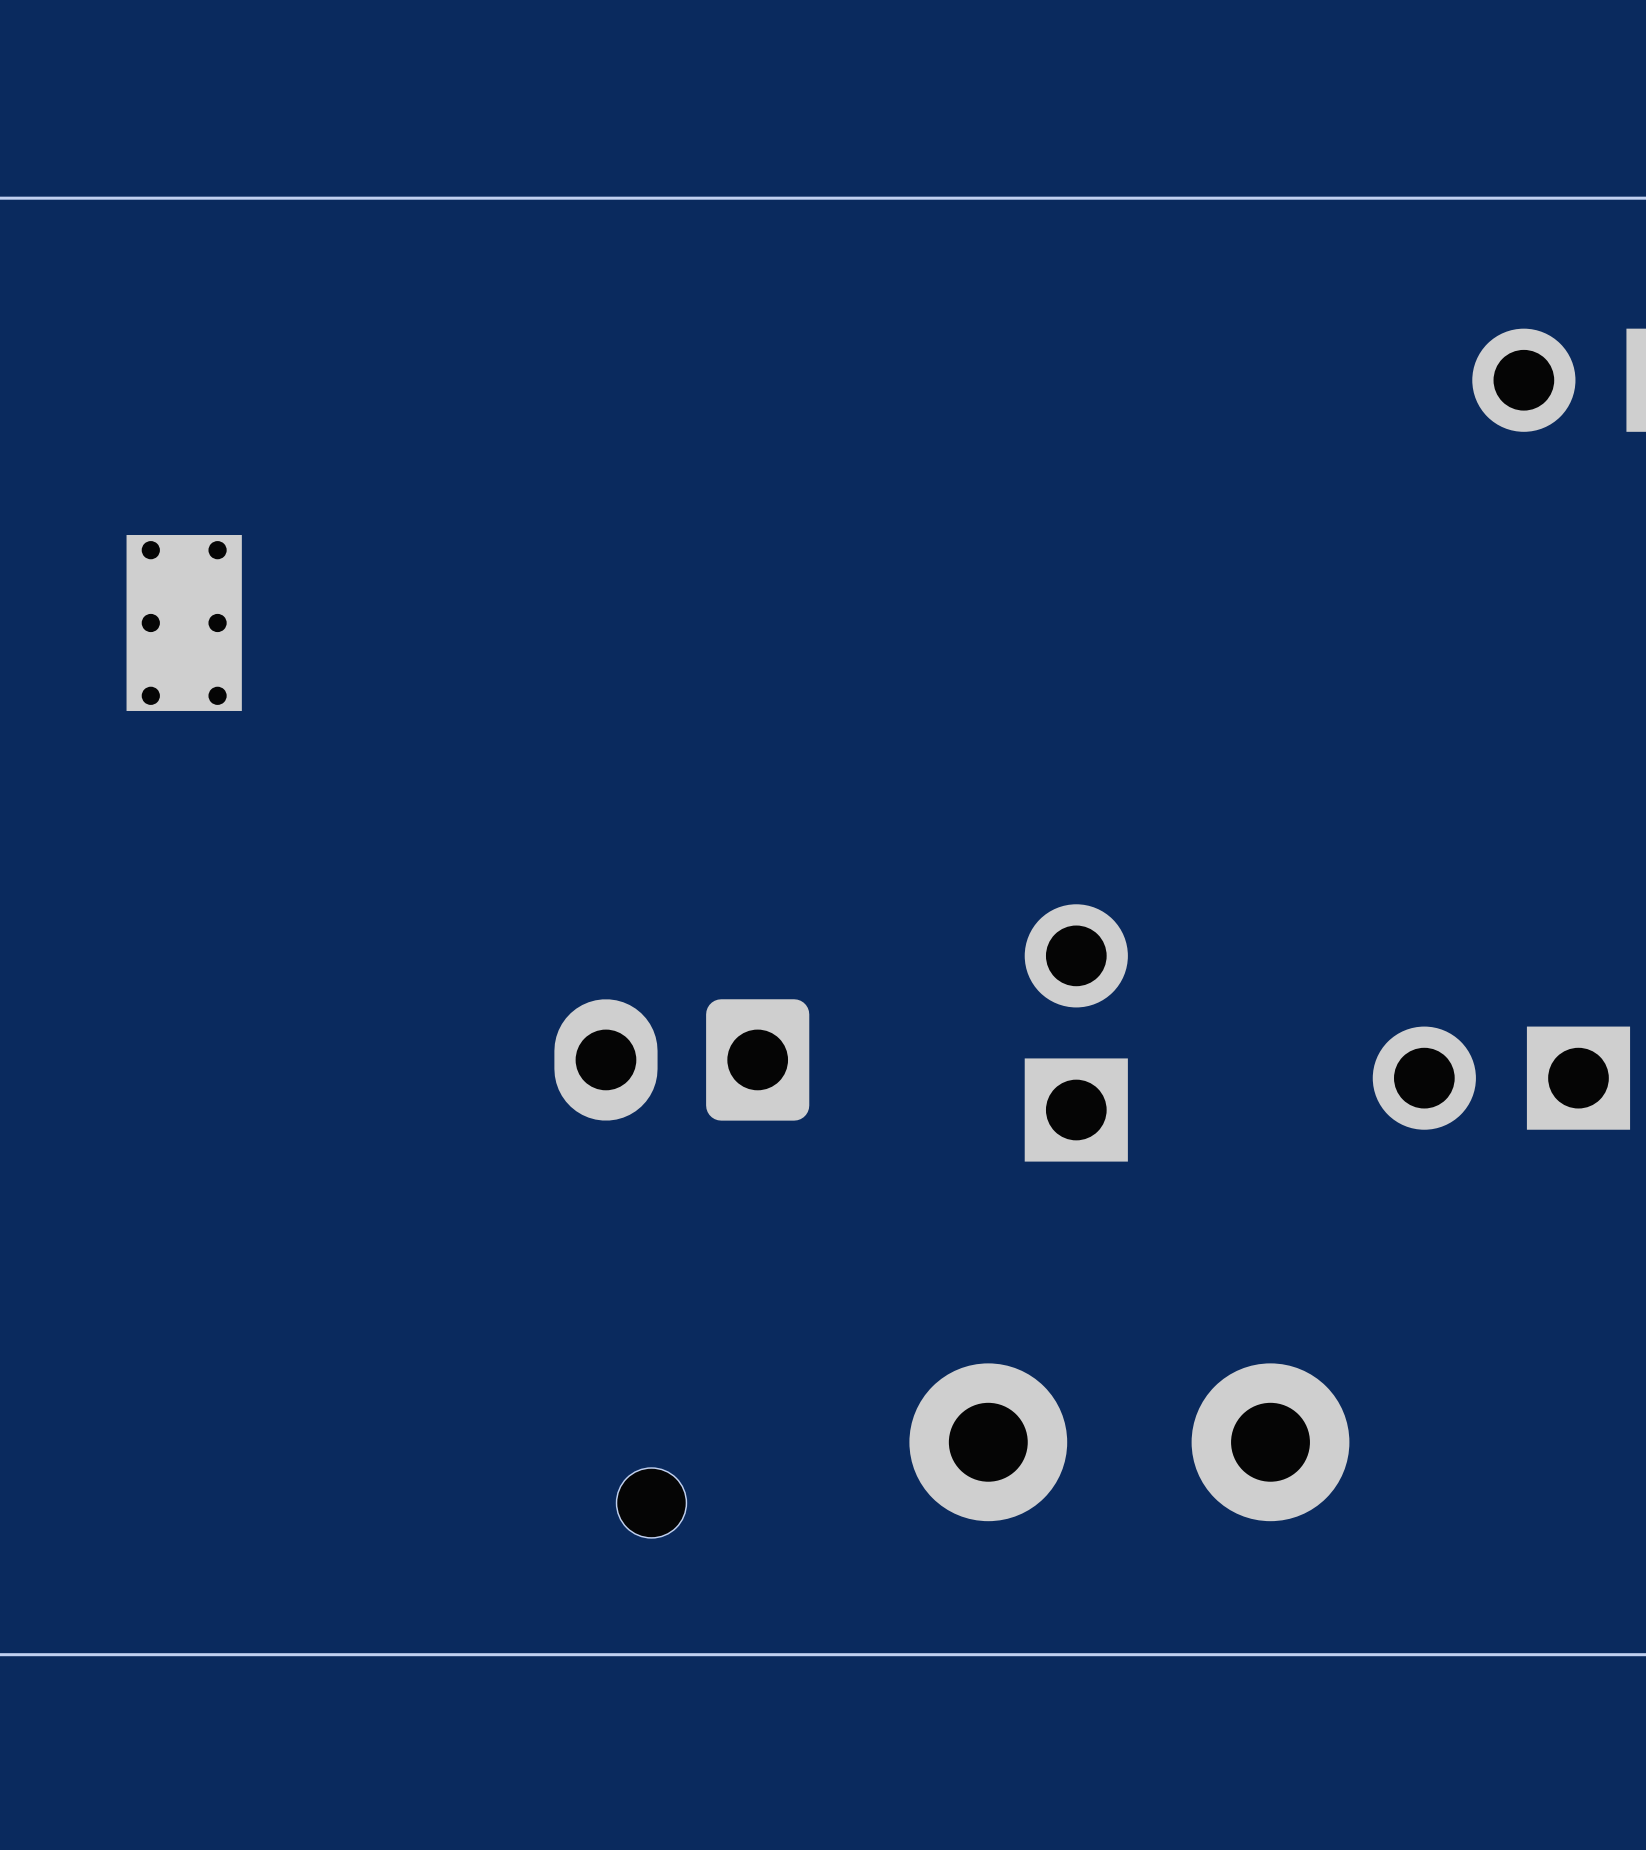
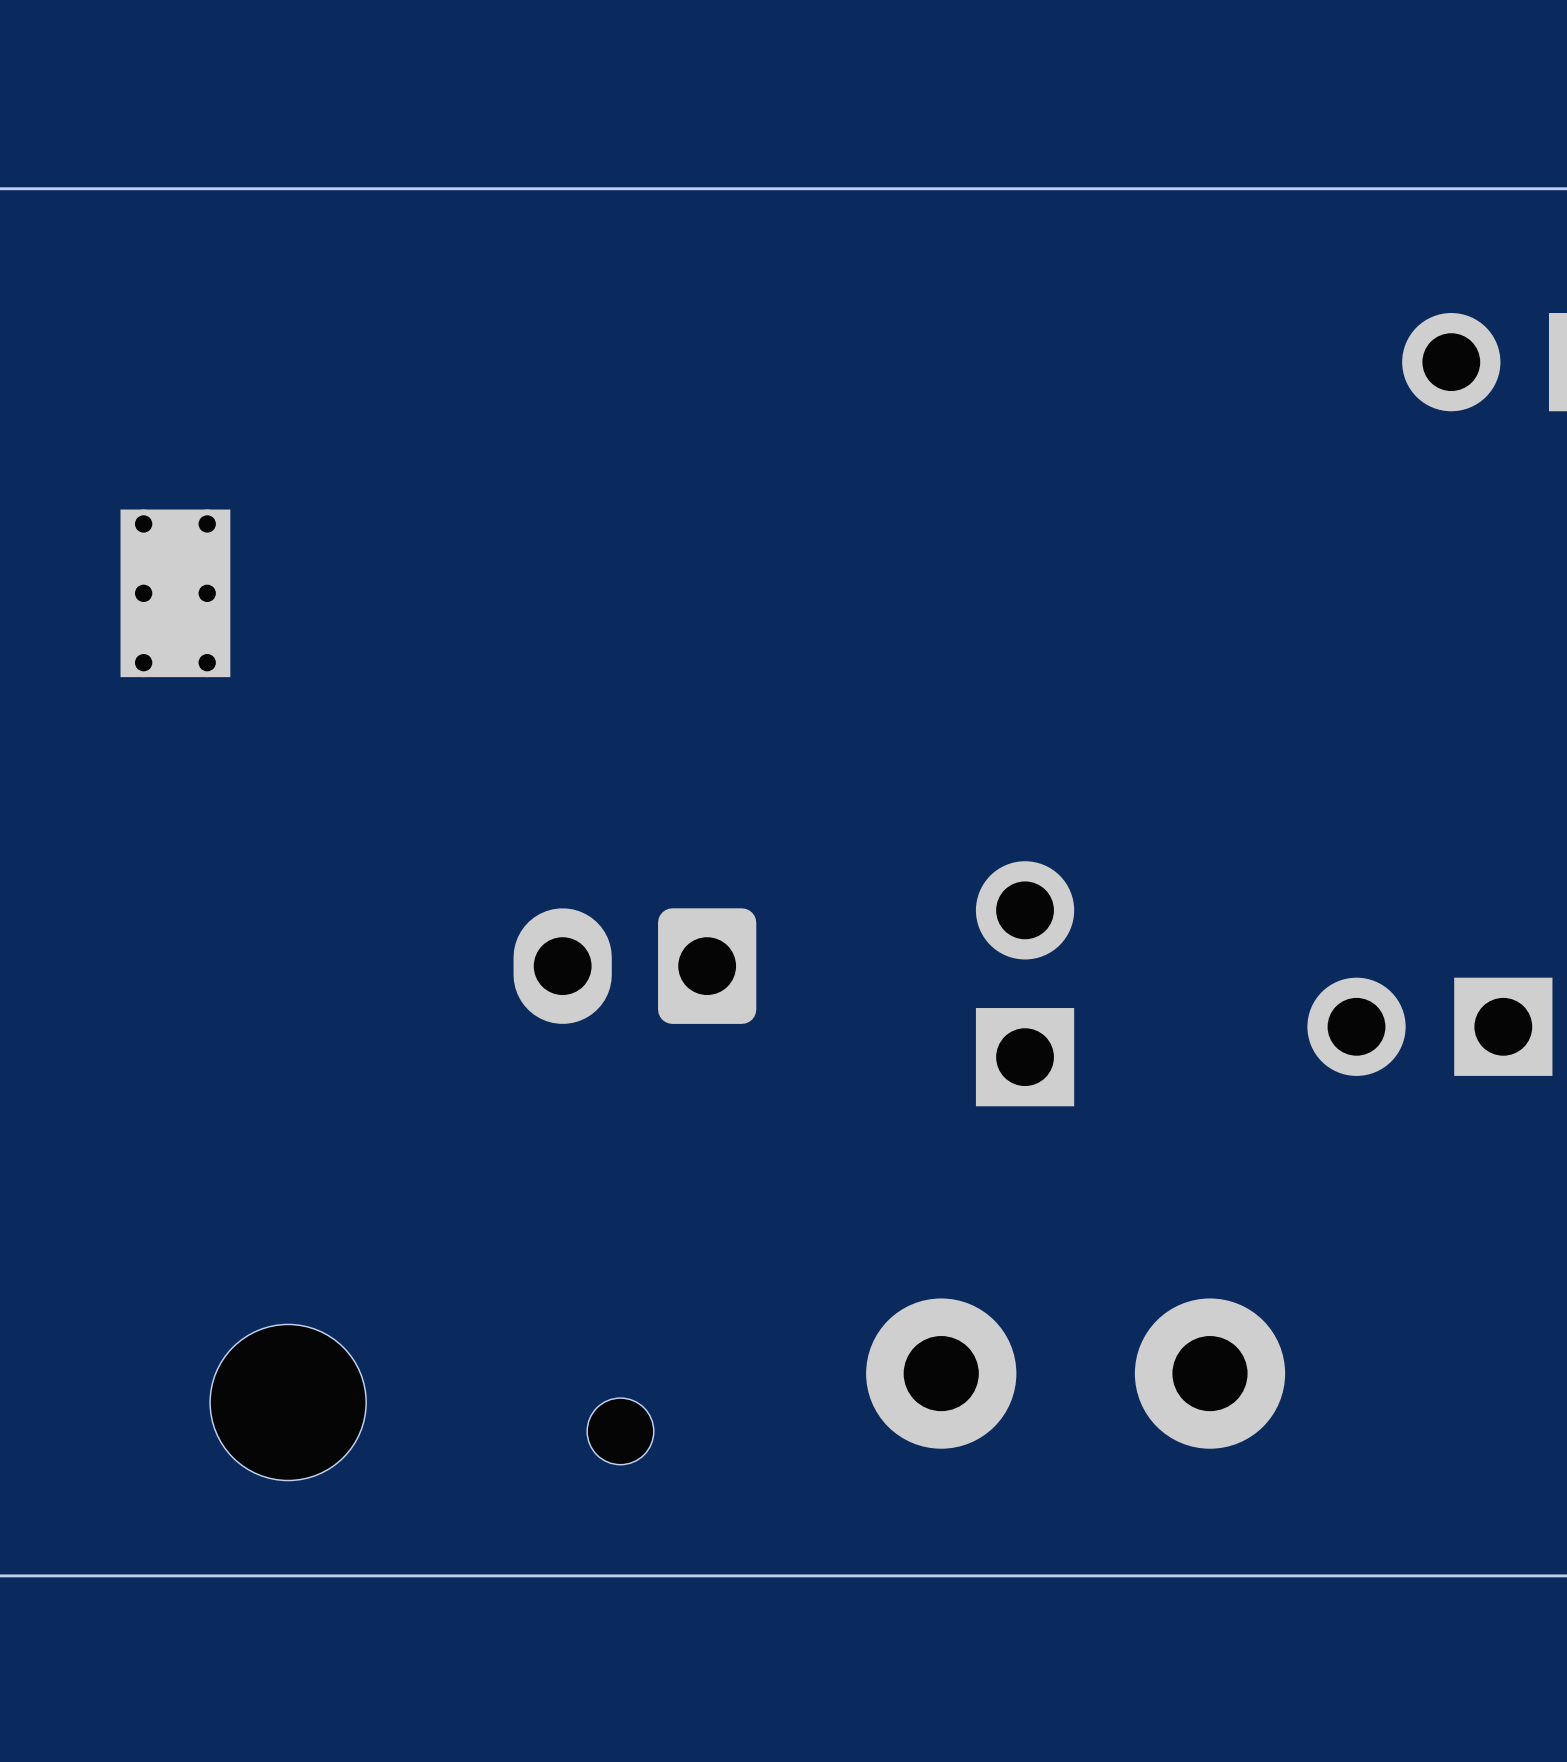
part position: (681, 1059) -> (634, 966)
part: none -> (288, 1402)

